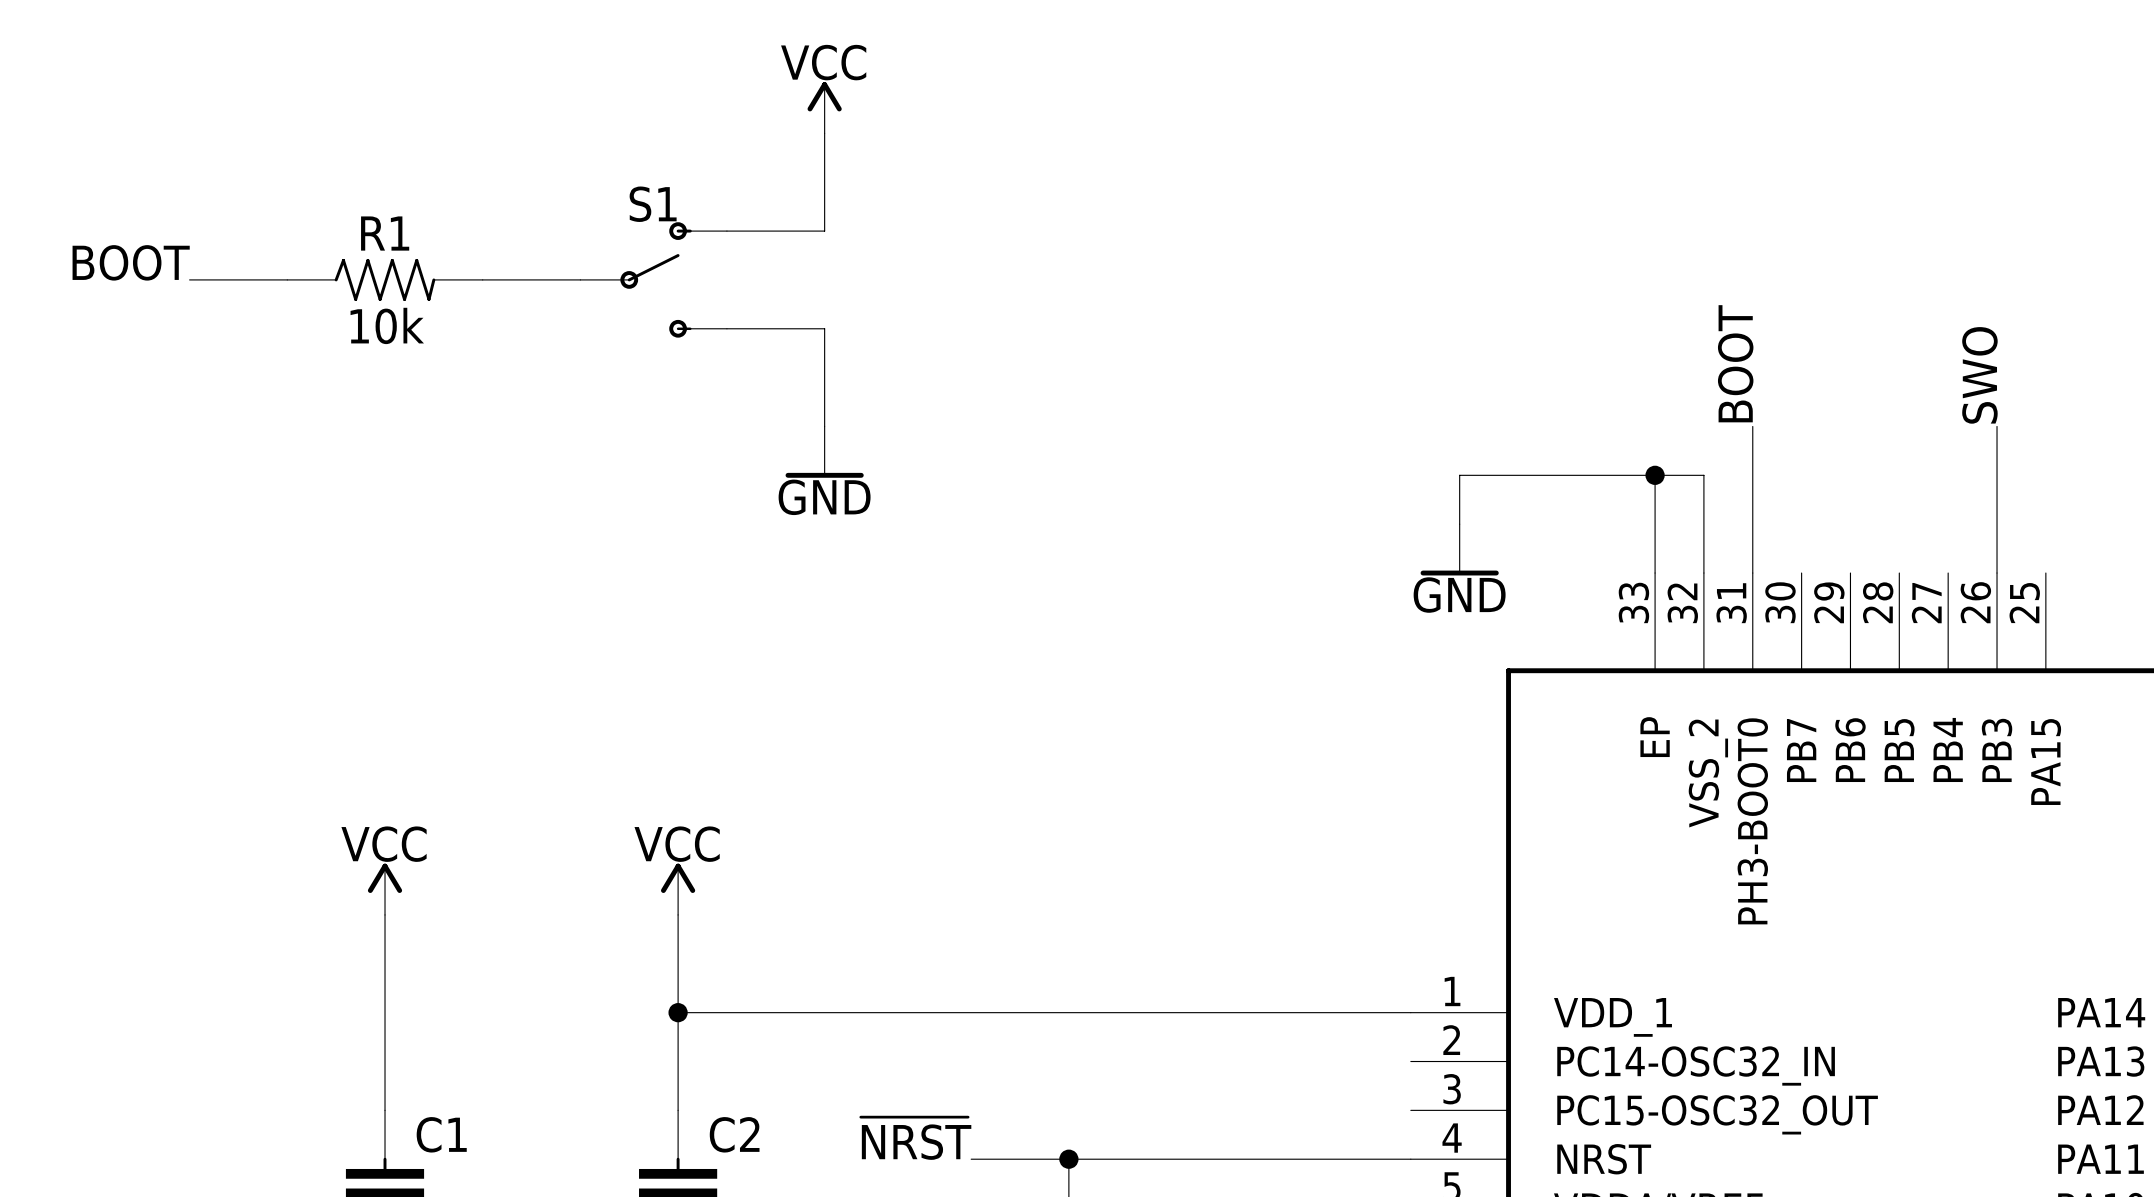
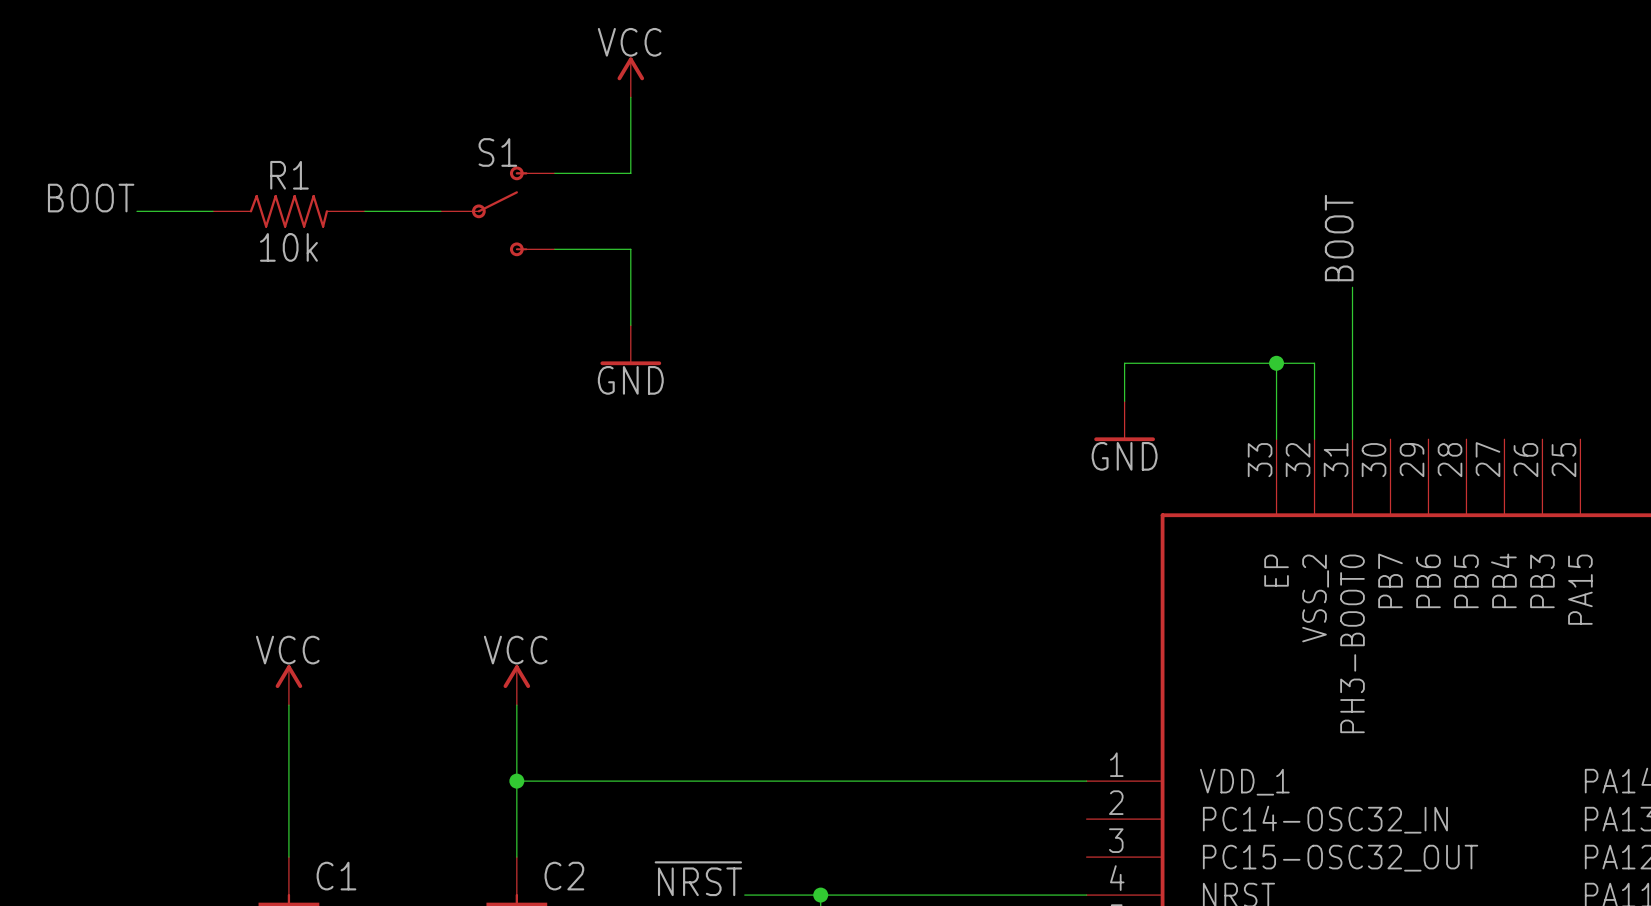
label position: BOOT (1735, 363) -> BOOT (1339, 238)
label: SWO (1979, 375) -> none
wire: none -> (1352, 287) (1352, 325)
wire: (1997, 426) (1997, 573) -> none

